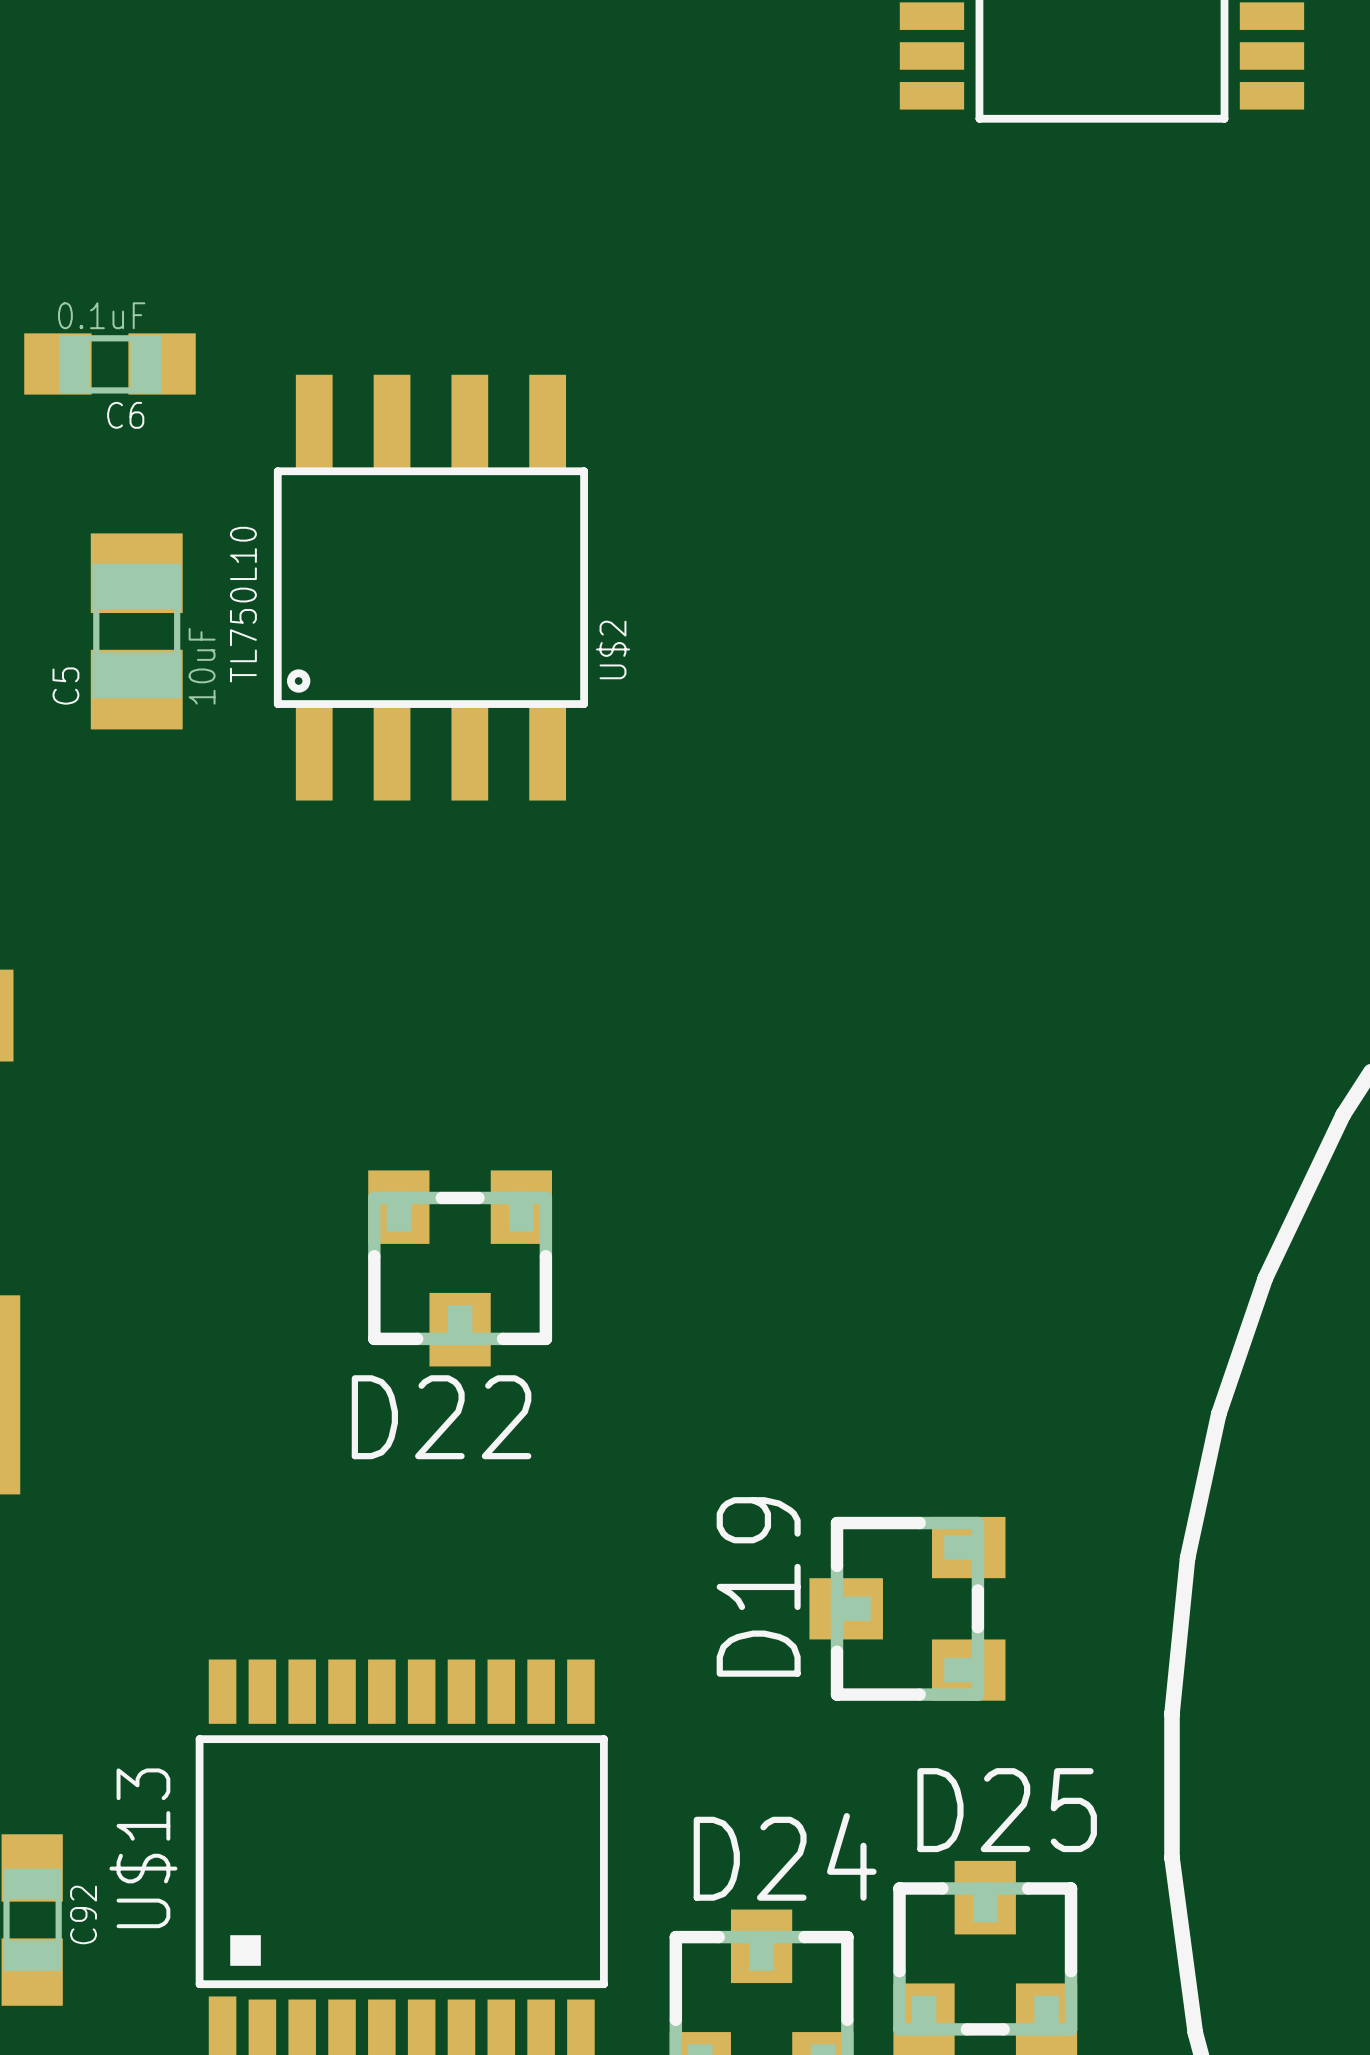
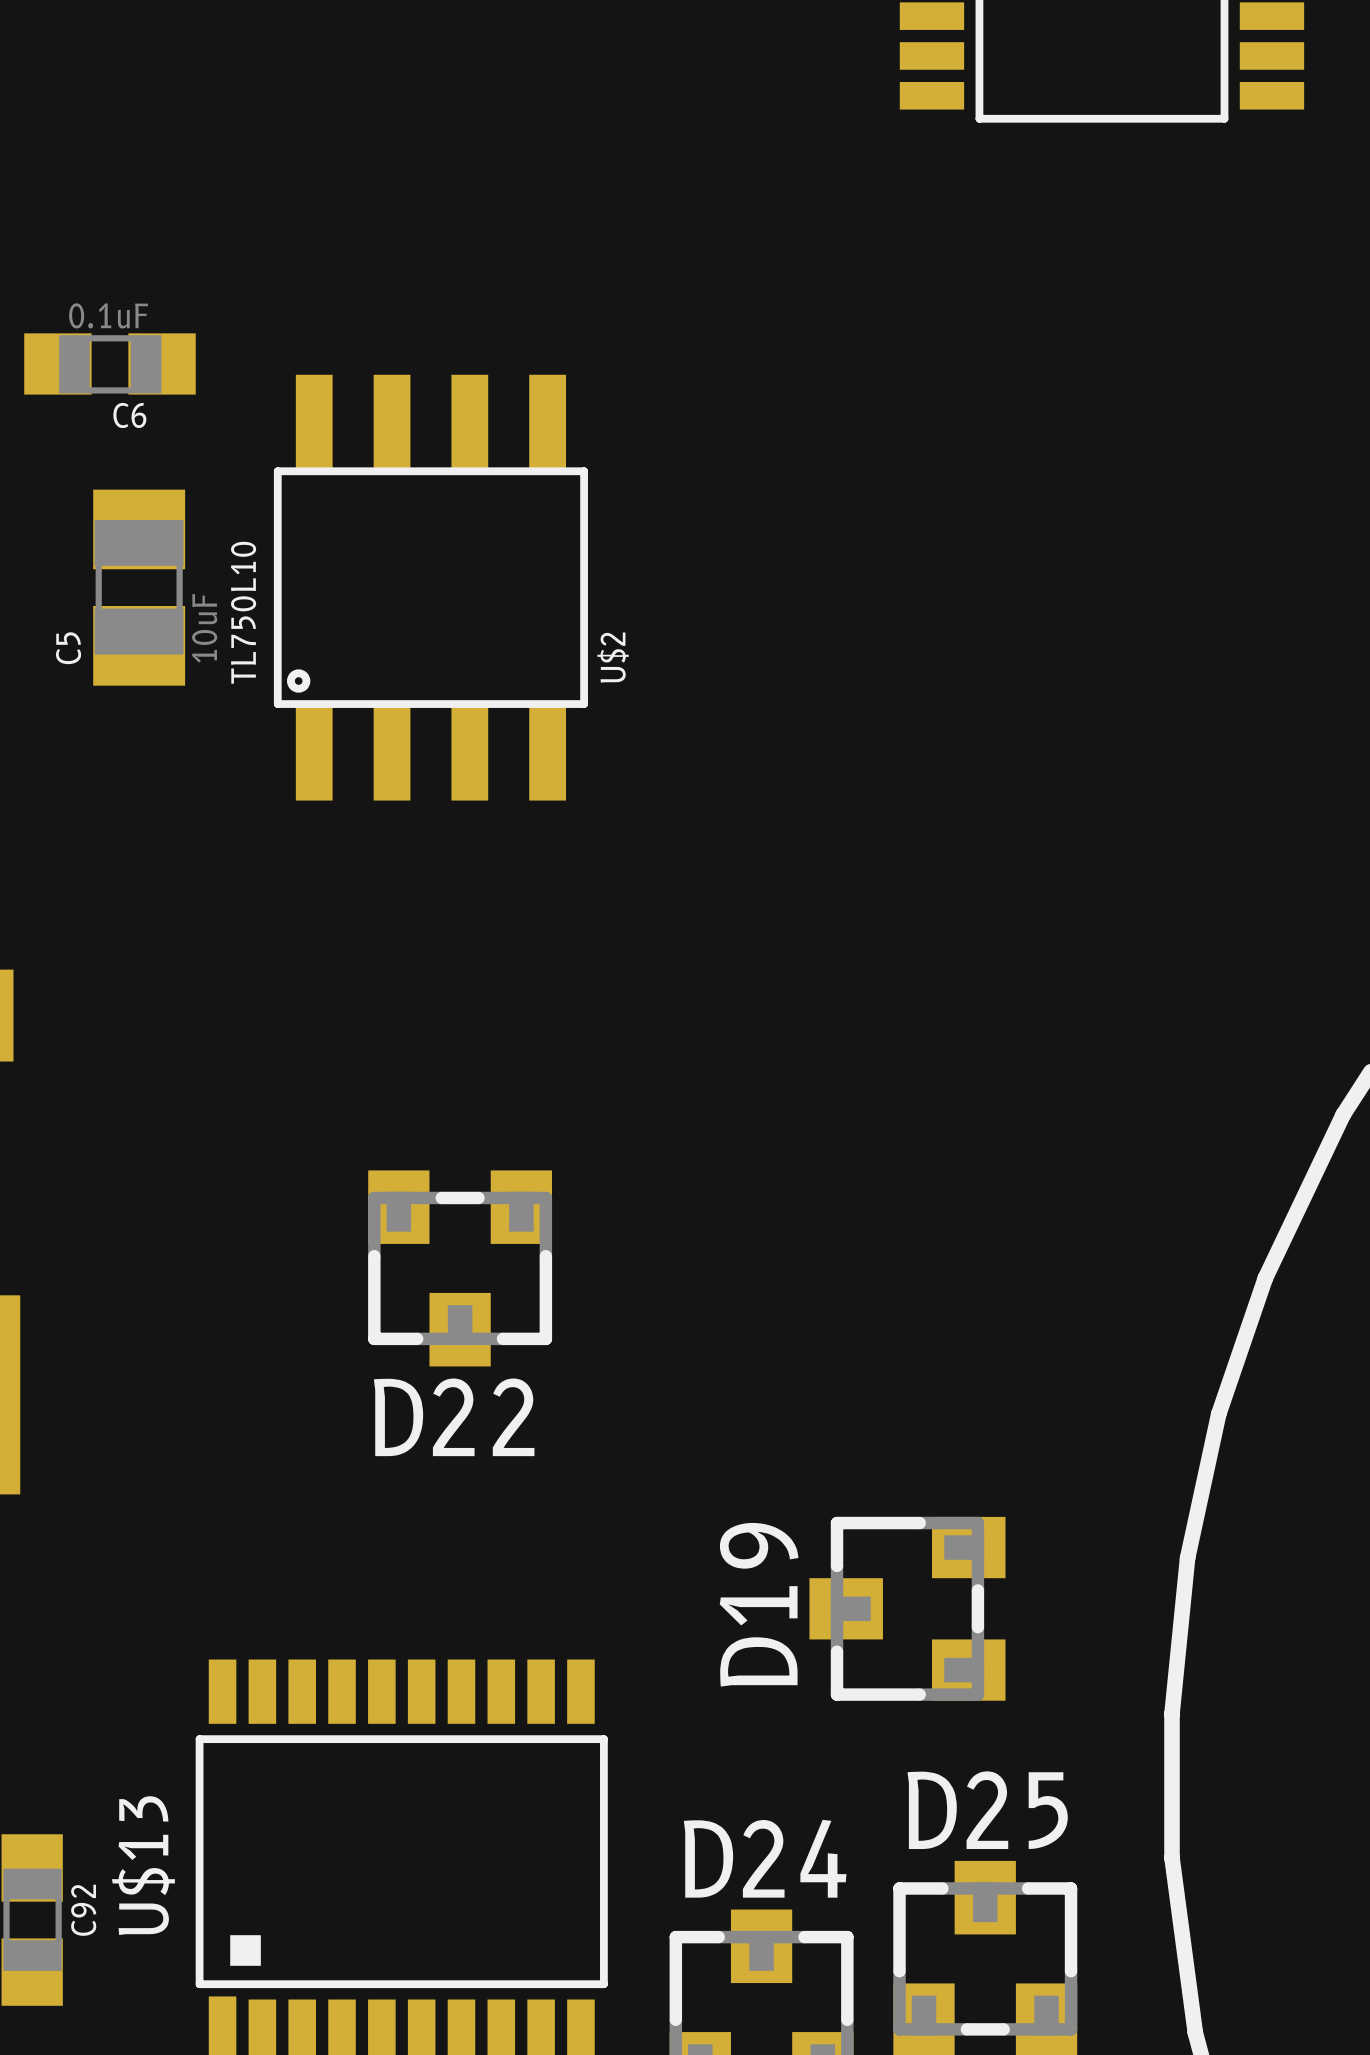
C5 position: (136, 631) -> (139, 587)

